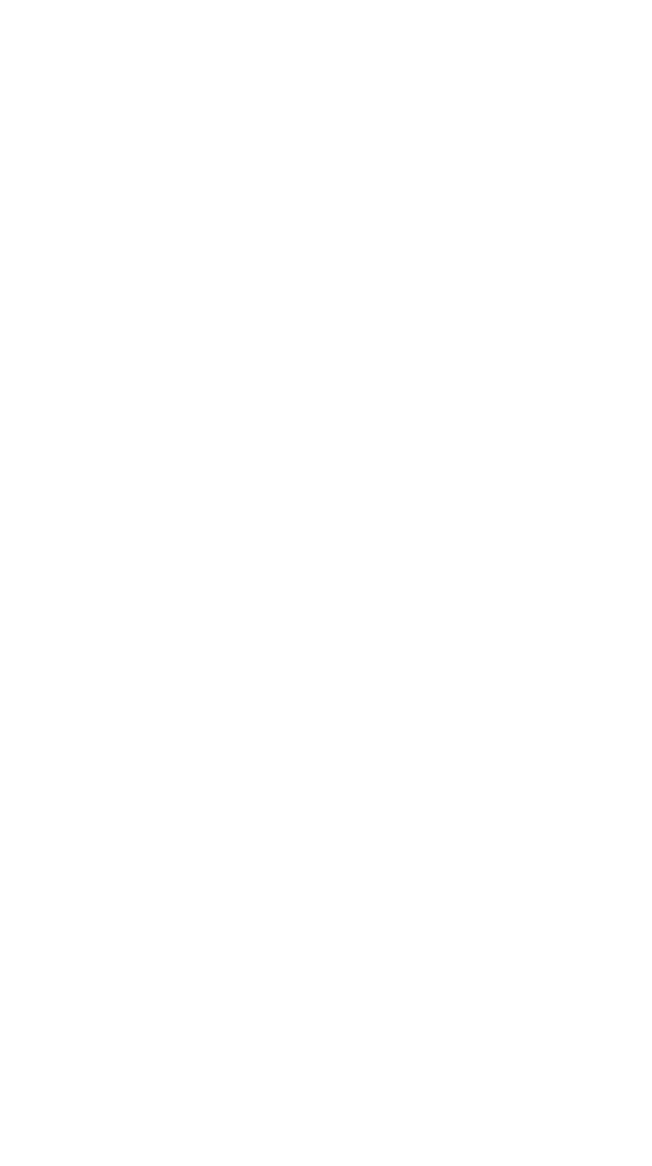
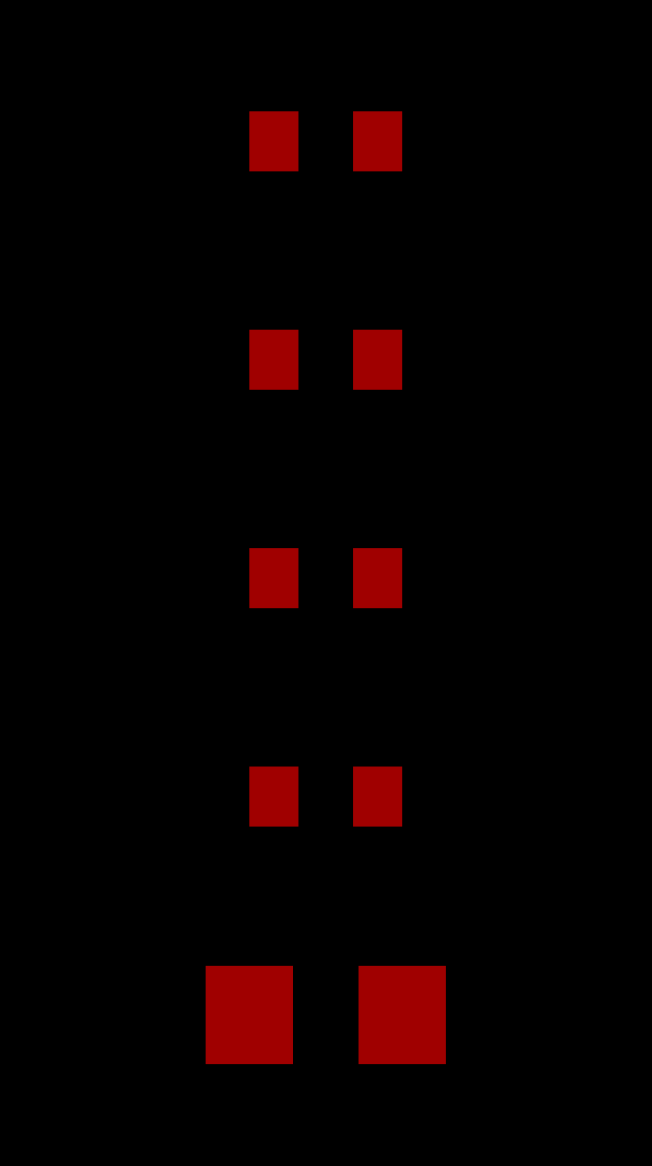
part: none -> (325, 141)
part: none -> (325, 359)
part: none -> (325, 578)
part: none -> (325, 796)
part: none -> (325, 1014)

